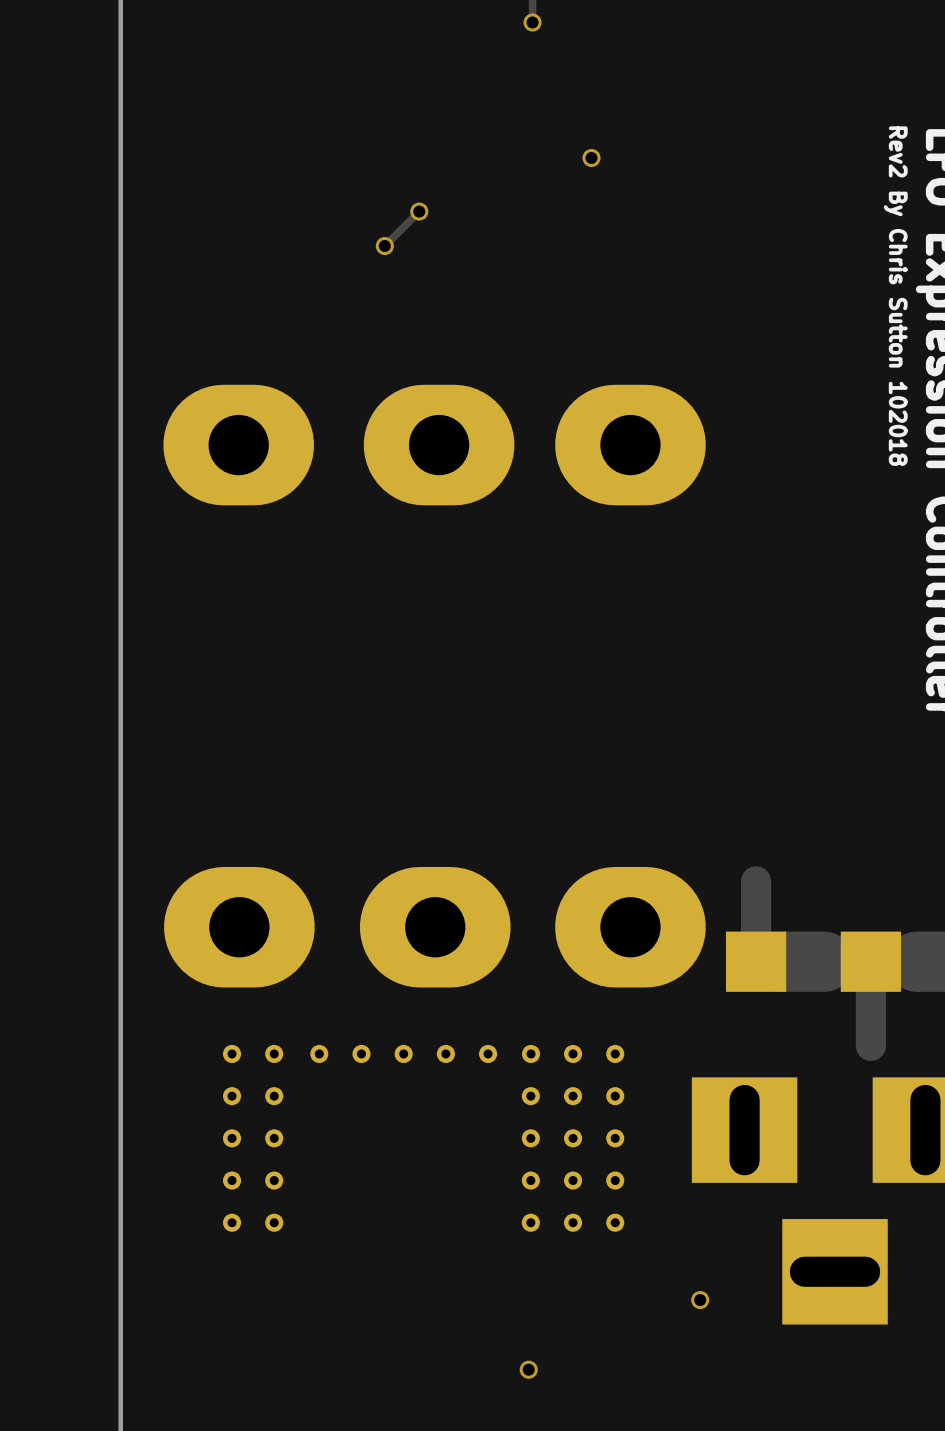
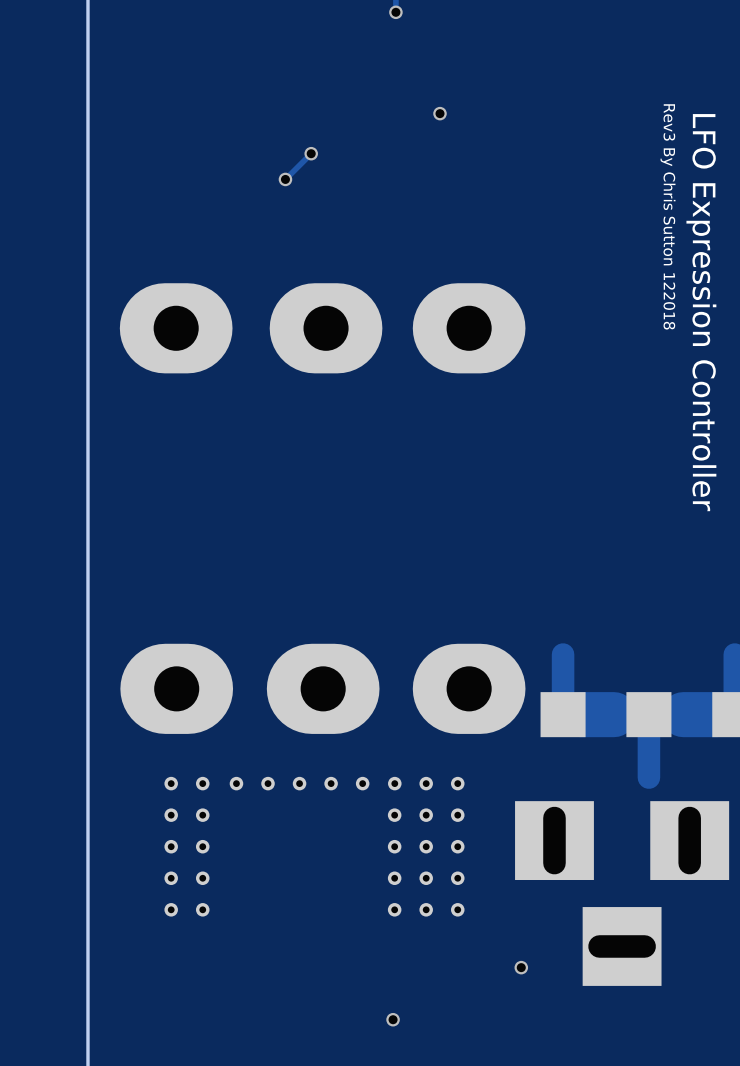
text: Rev2 By Chris Sutton 102018 (895, 296) -> Rev3 By Chris Sutton 122018 (668, 216)

